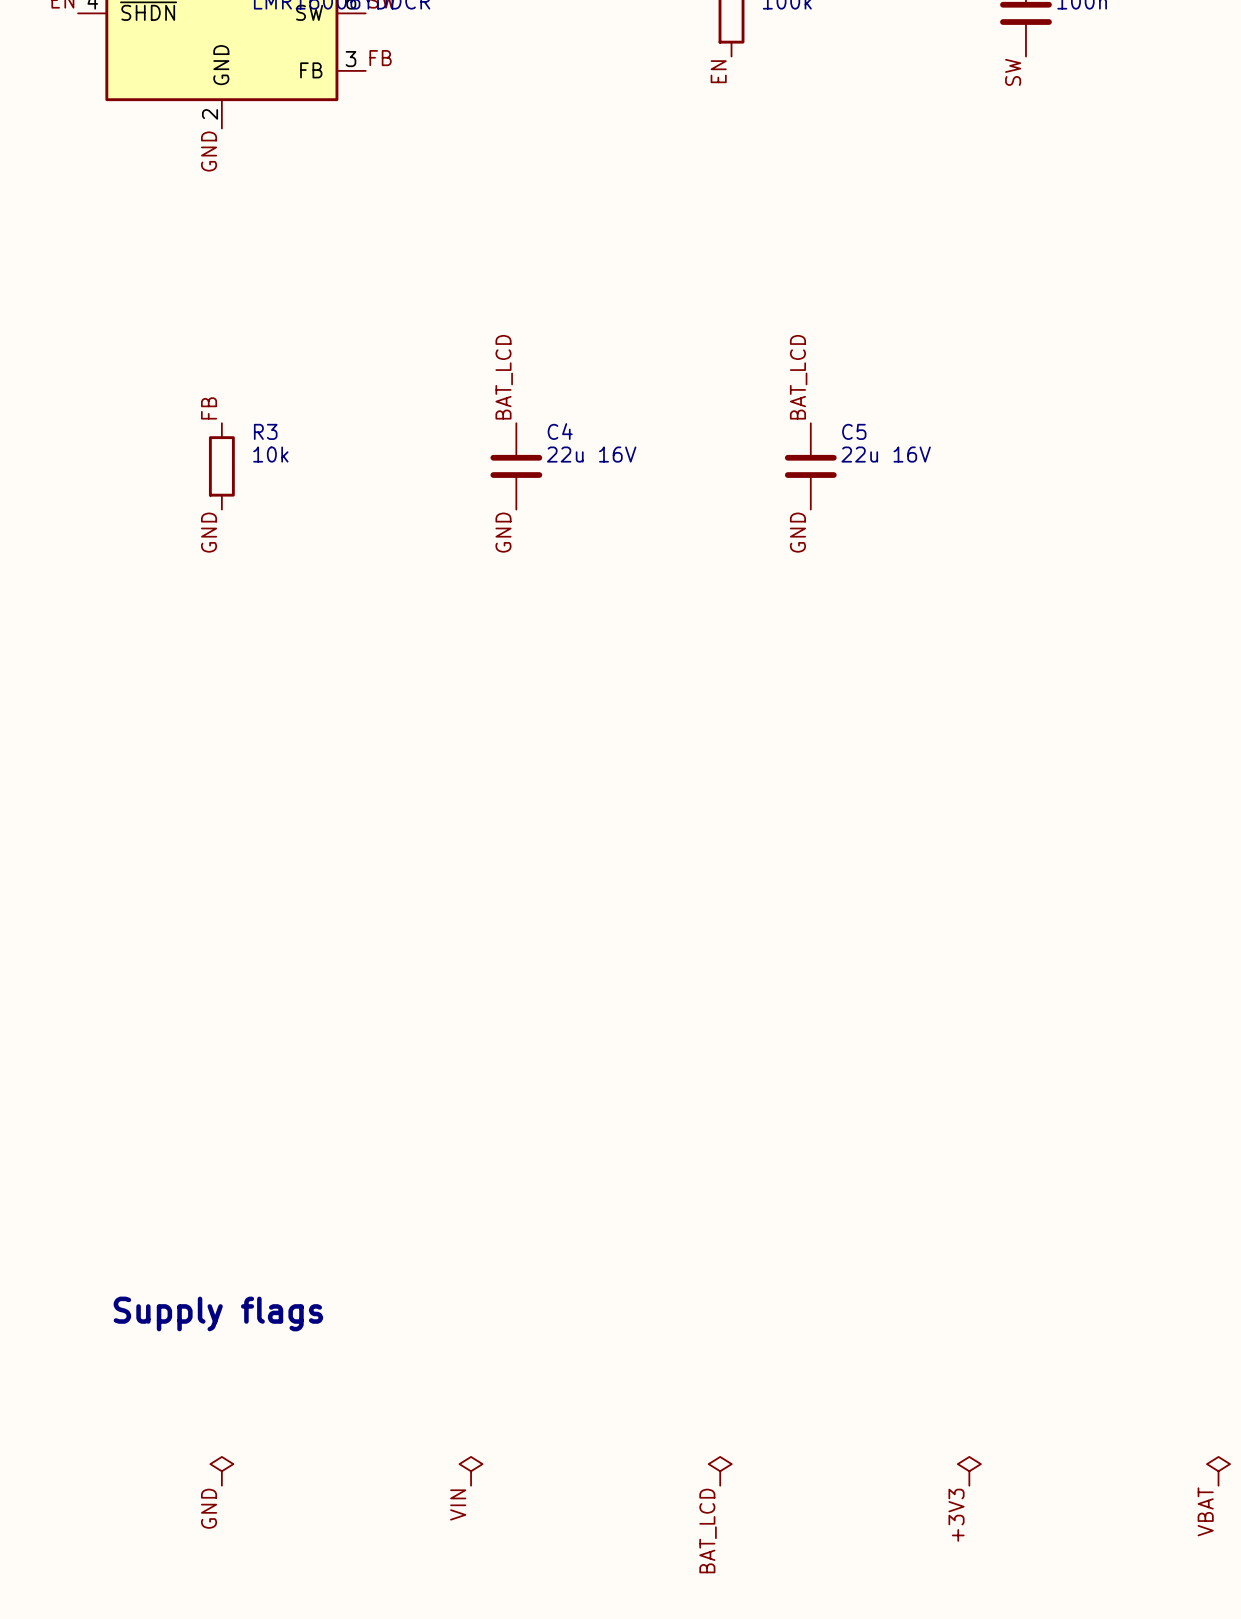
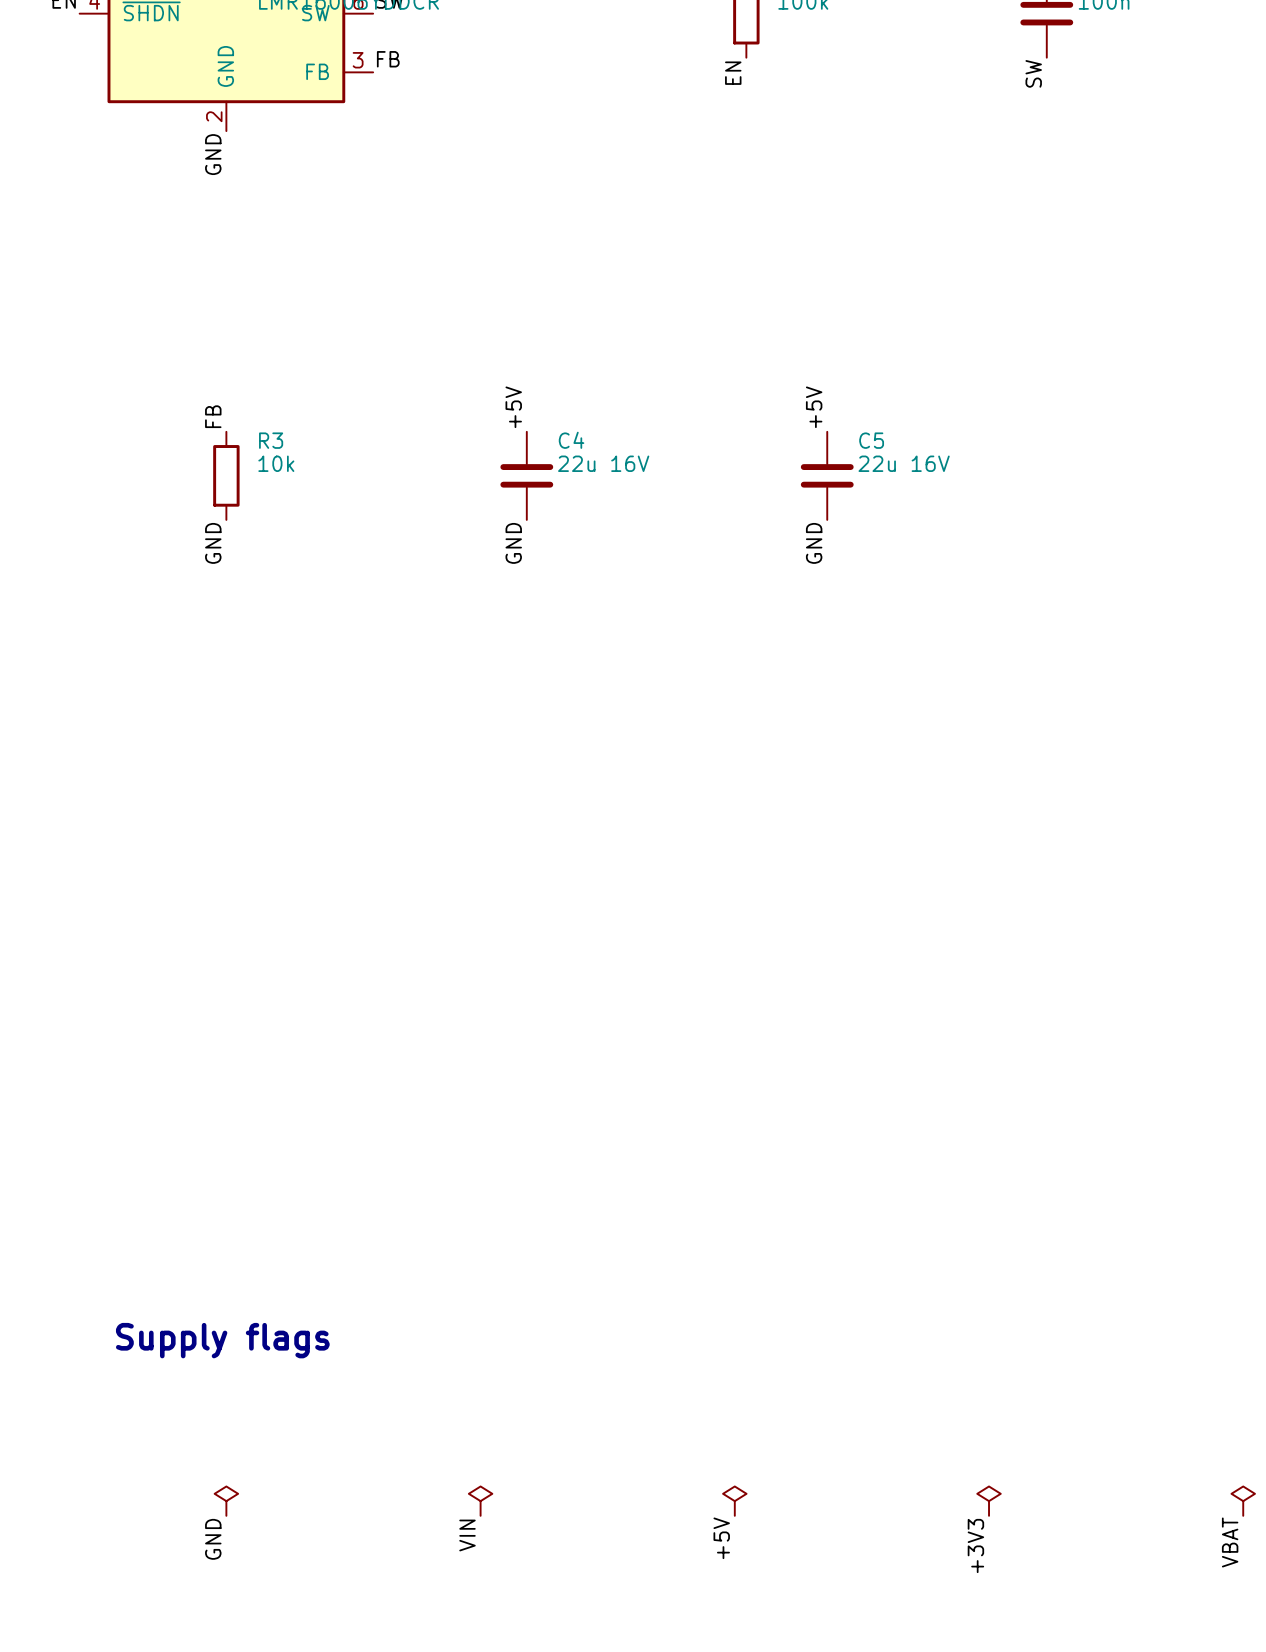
label: BAT_LCD (504, 377) -> +5V (513, 407)
label: BAT_LCD (798, 377) -> +5V (814, 407)
label: BAT_LCD (708, 1530) -> +5V (721, 1538)

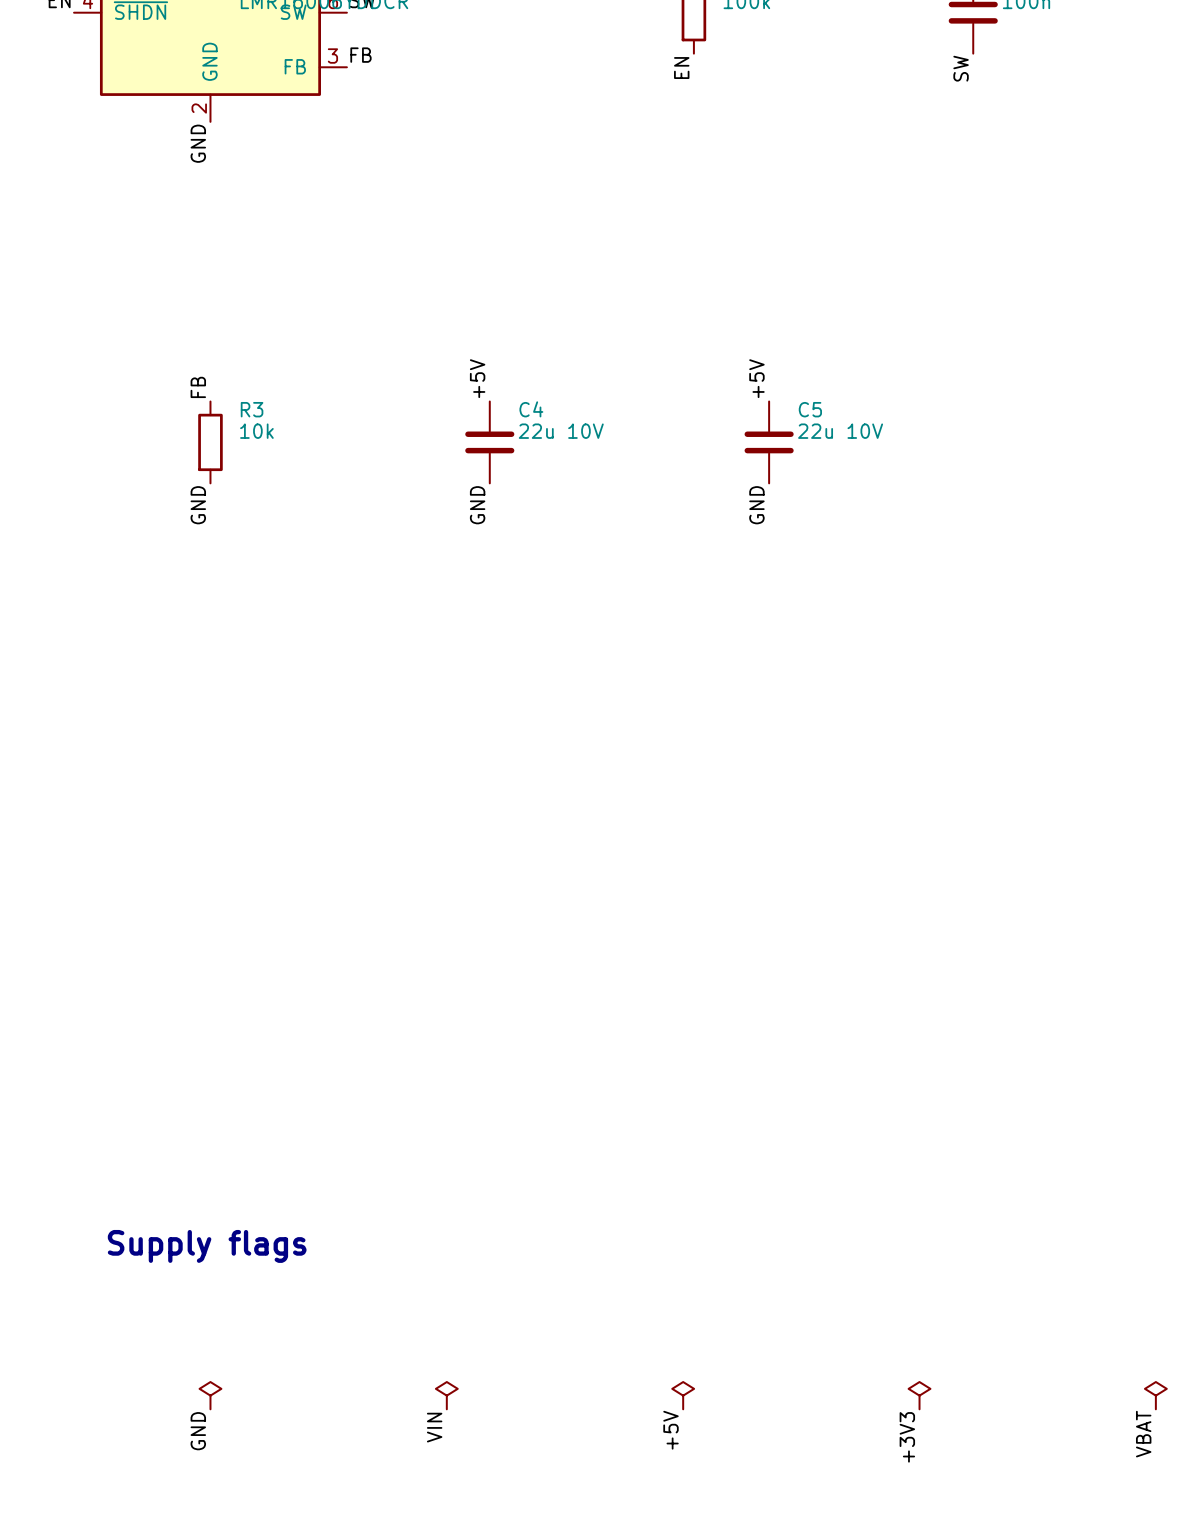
C4 value: 22u 16V (603, 463) -> 22u 10V (561, 431)
C5 value: 22u 16V (904, 463) -> 22u 10V (840, 431)

